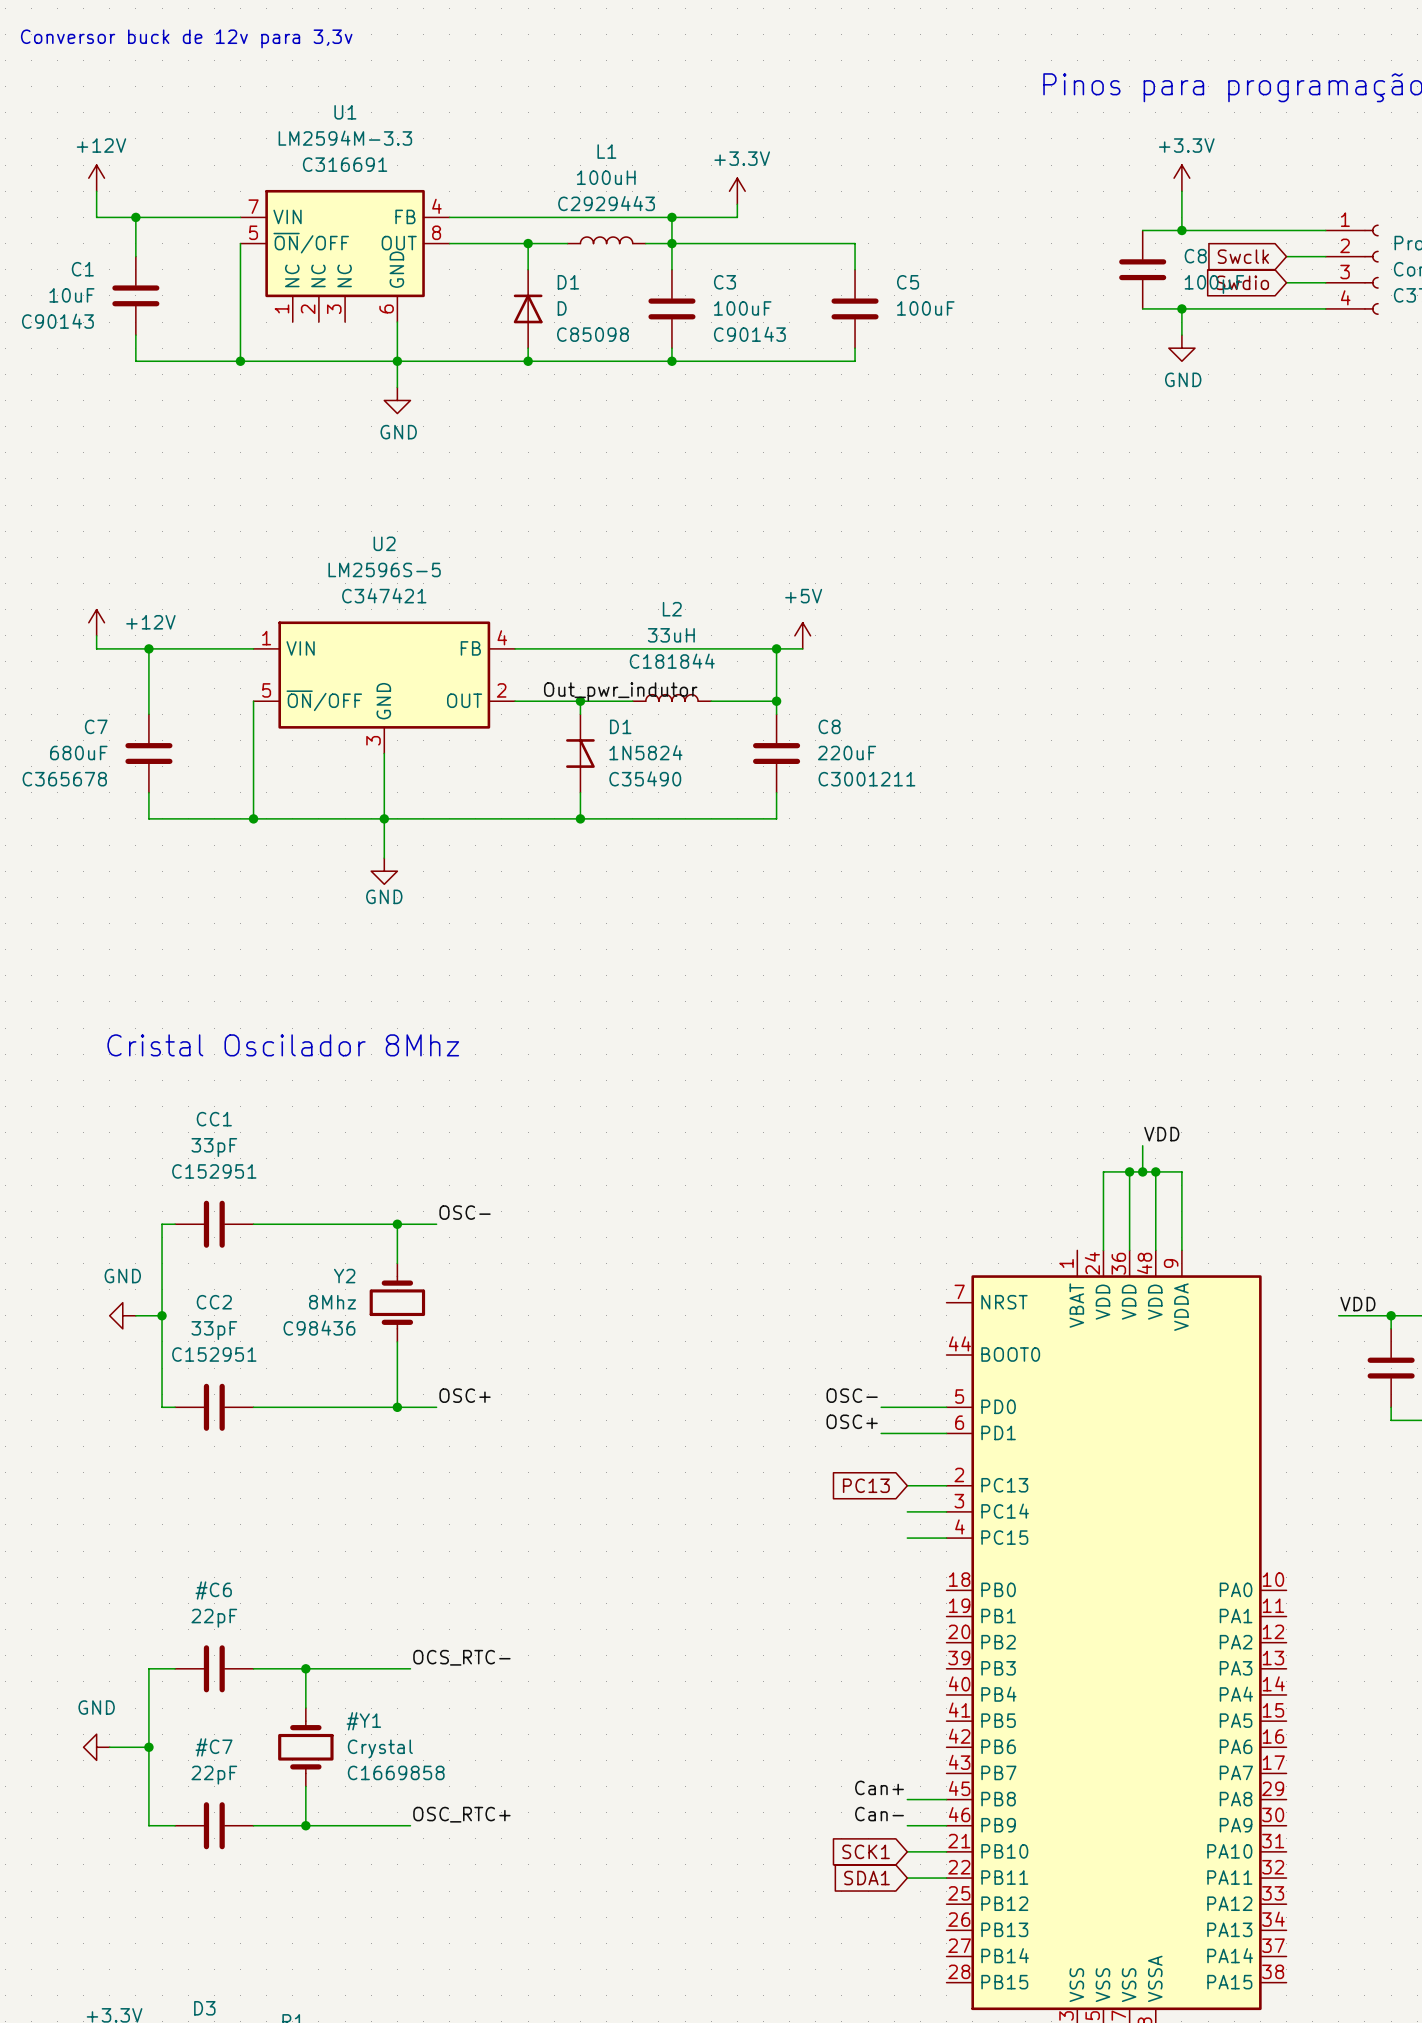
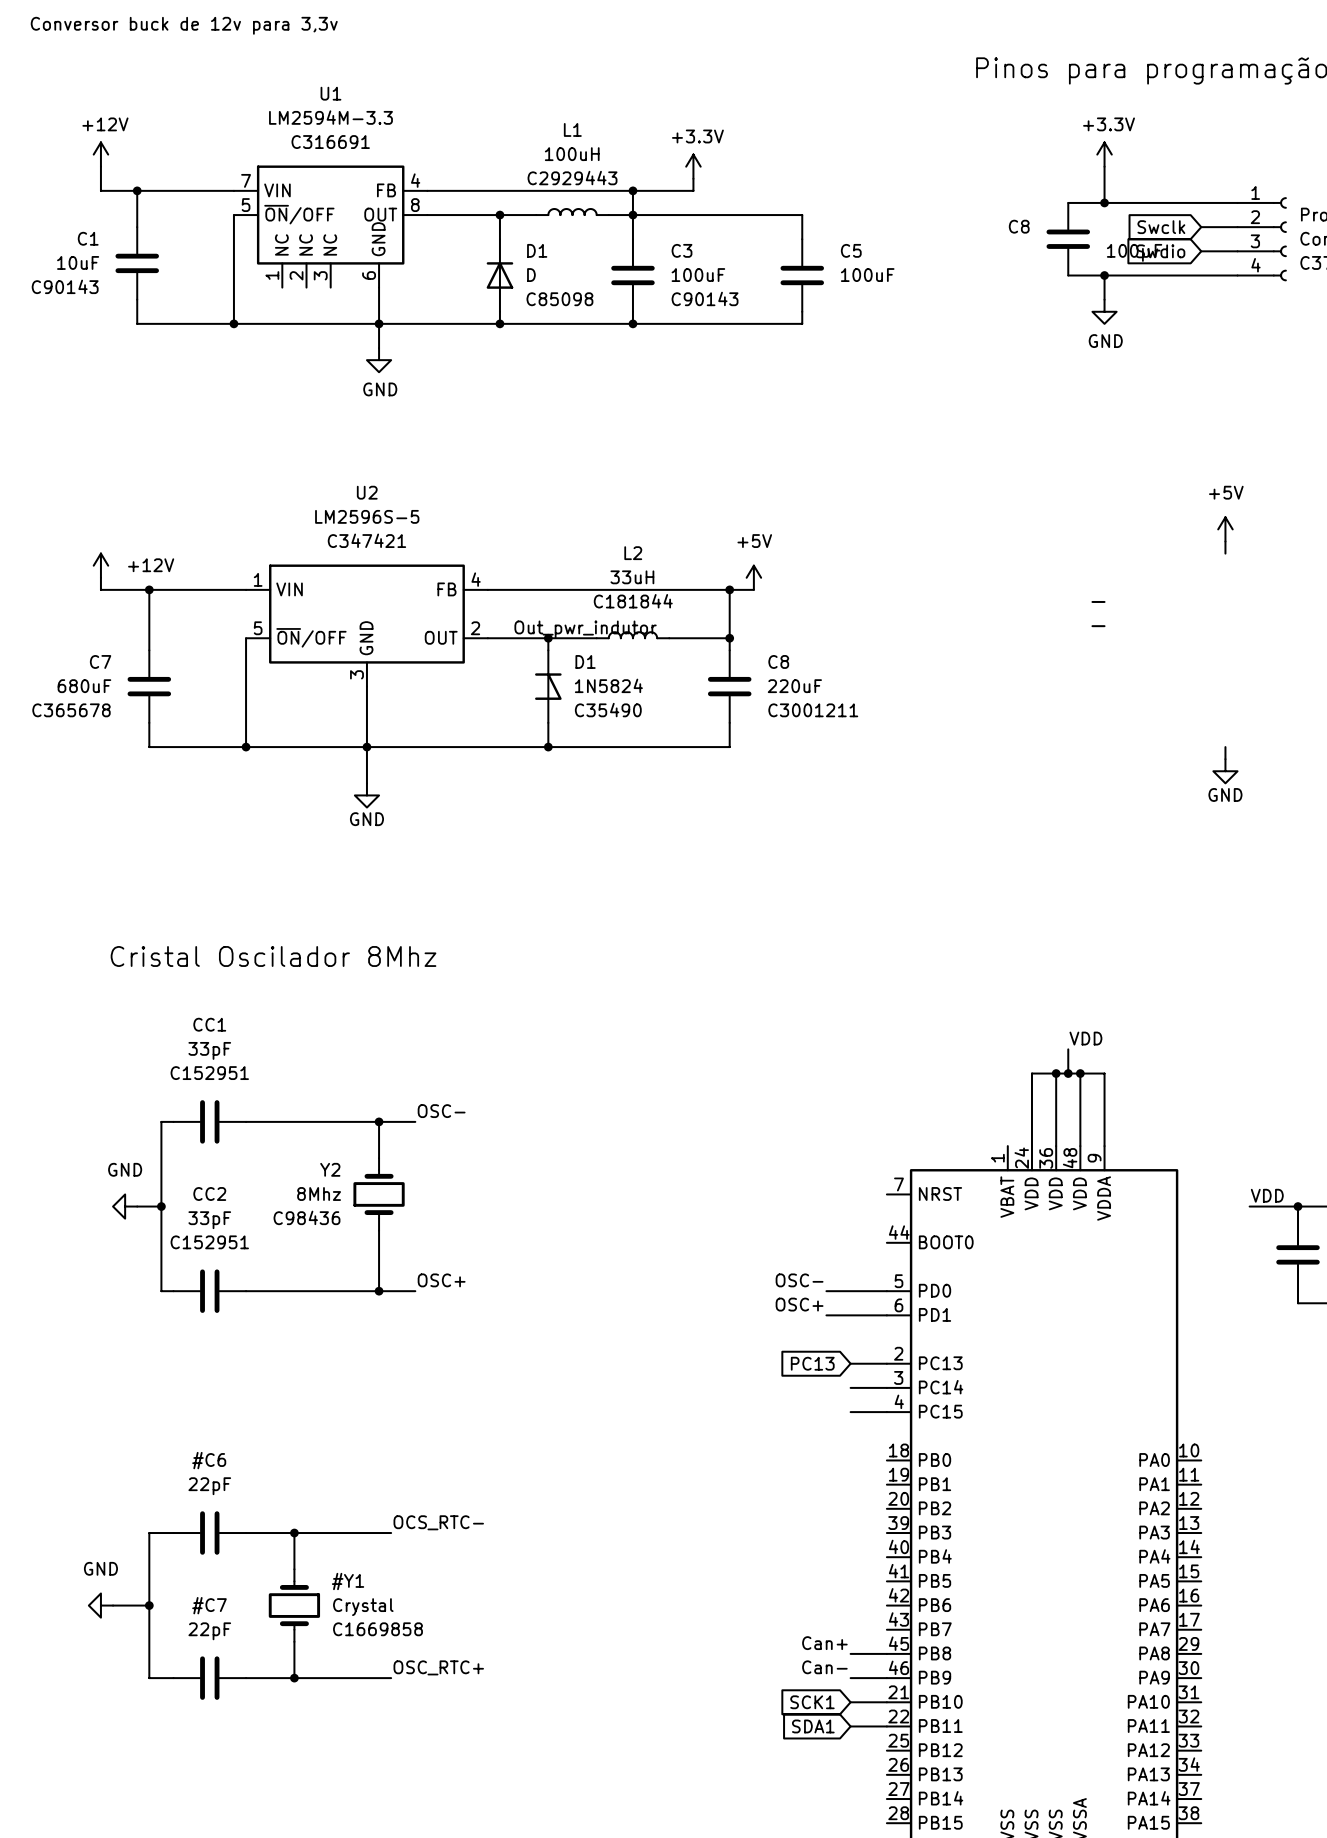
C8 name position: C8 (1195, 256) -> C8 (1019, 226)
power symbol: none -> +5V (1225, 529)
wire: none -> (1225, 541) (1225, 553)
wire: none -> (1092, 601) (1104, 601)
wire: none -> (1092, 626) (1104, 626)
wire: none -> (1225, 747) (1225, 759)
power symbol: none -> GND (1225, 771)

